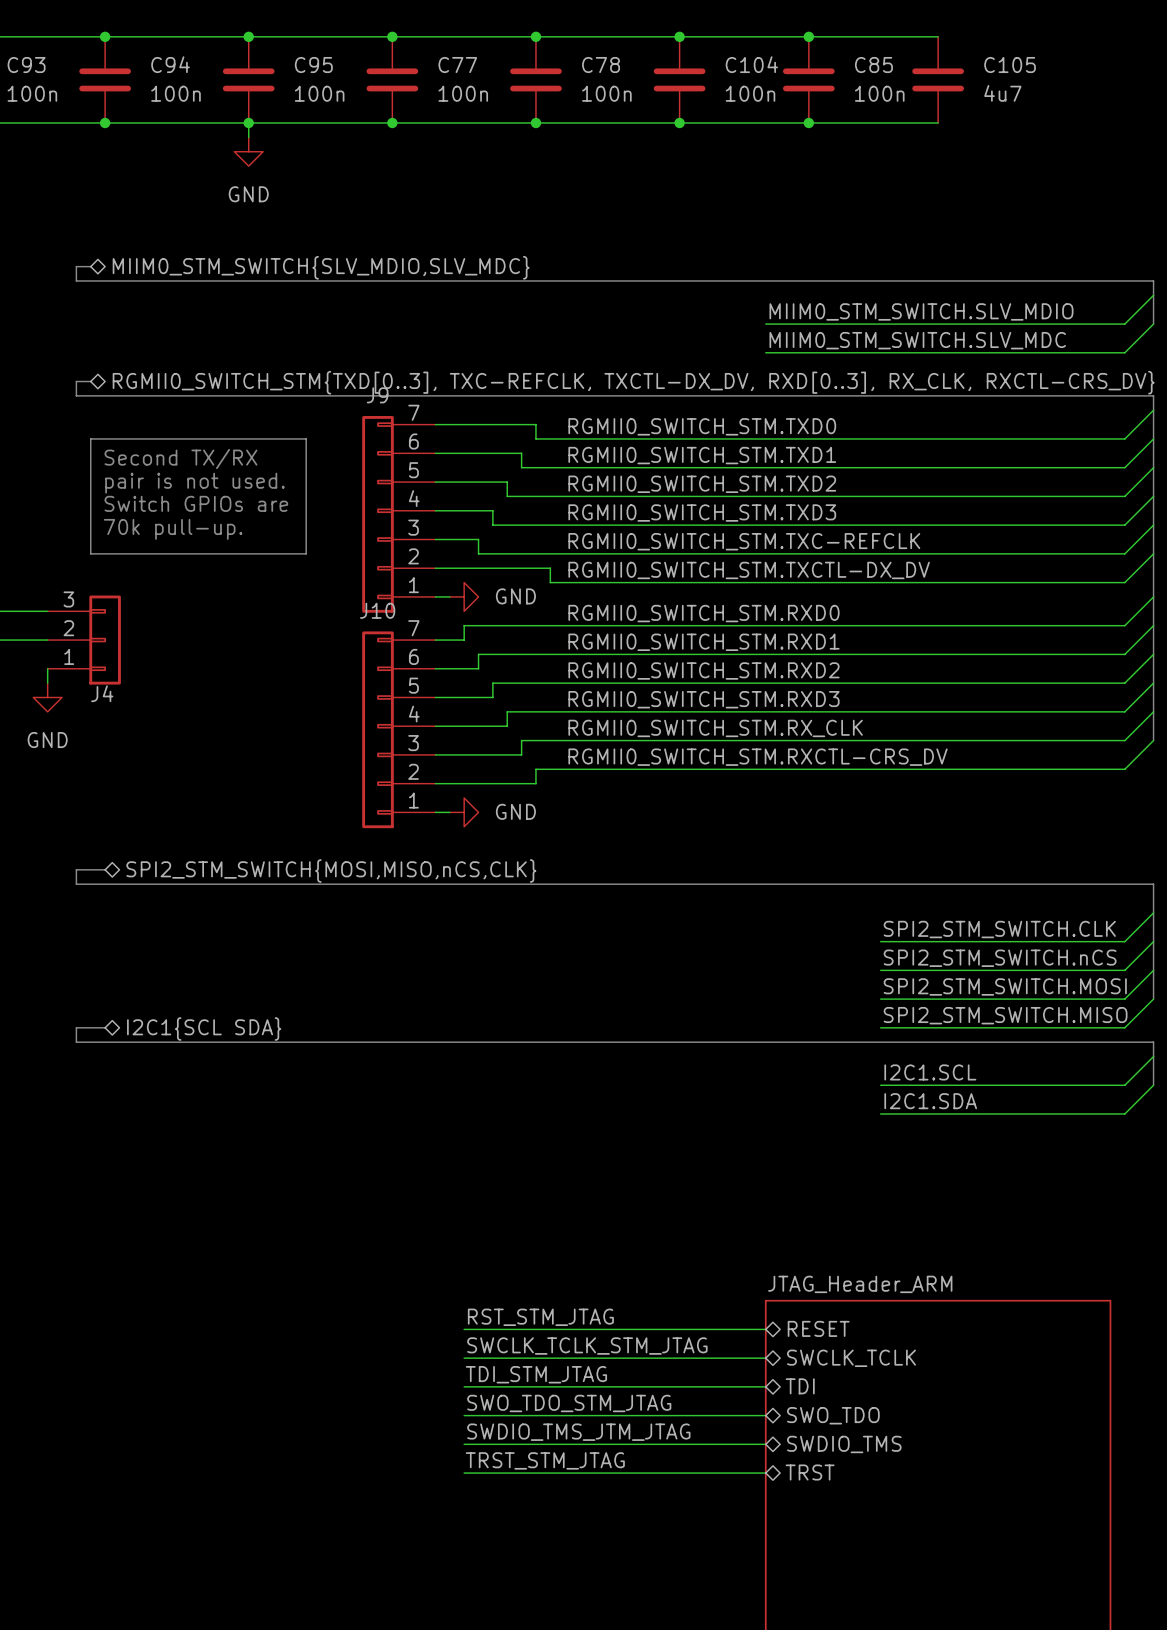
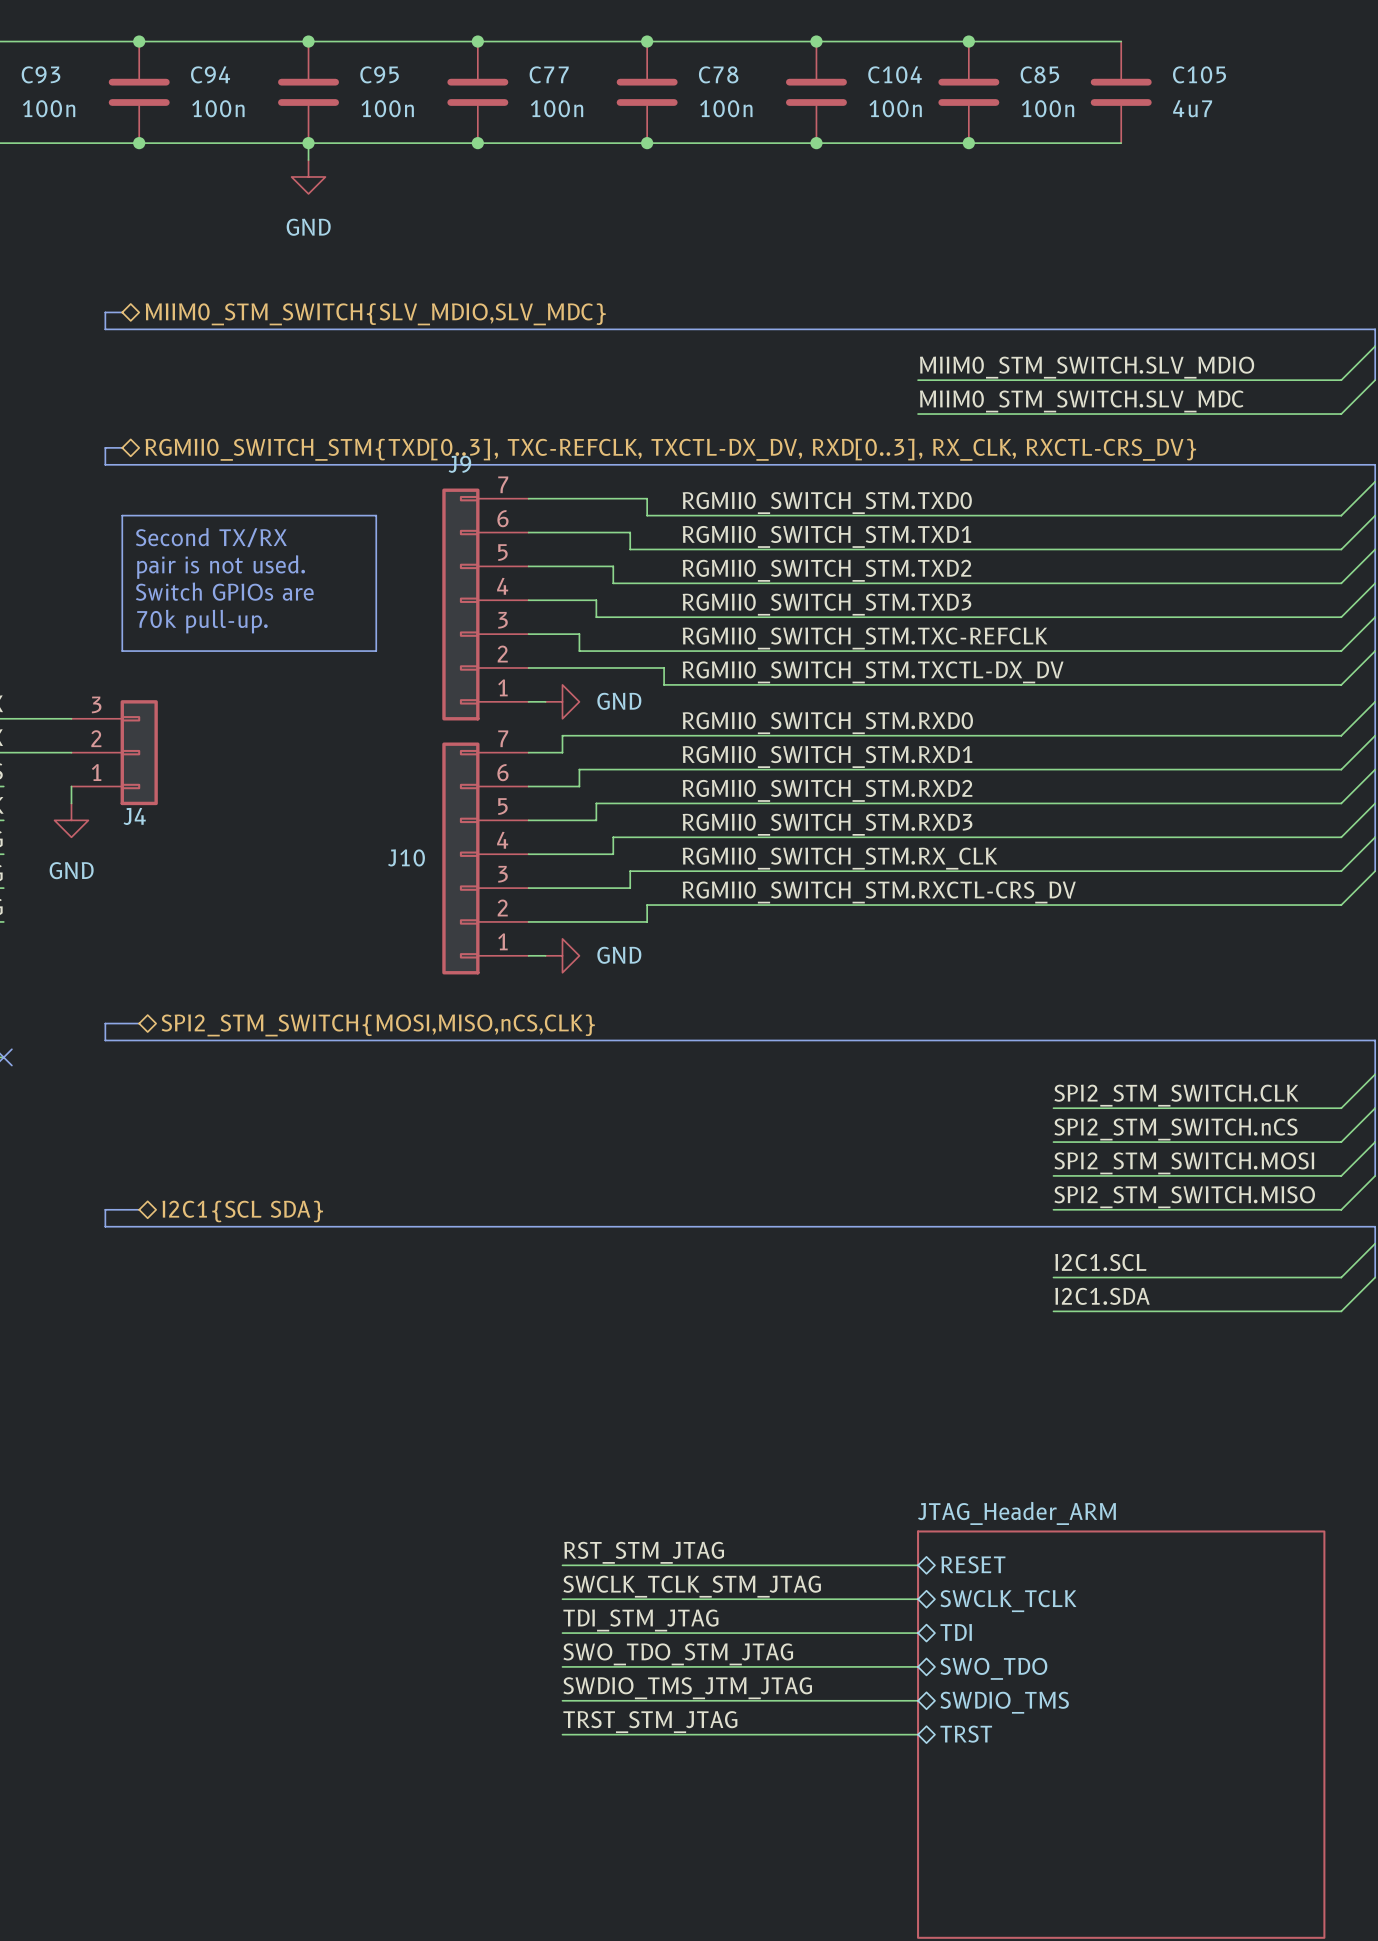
J10 name position: J10 (377, 610) -> J10 (406, 857)

